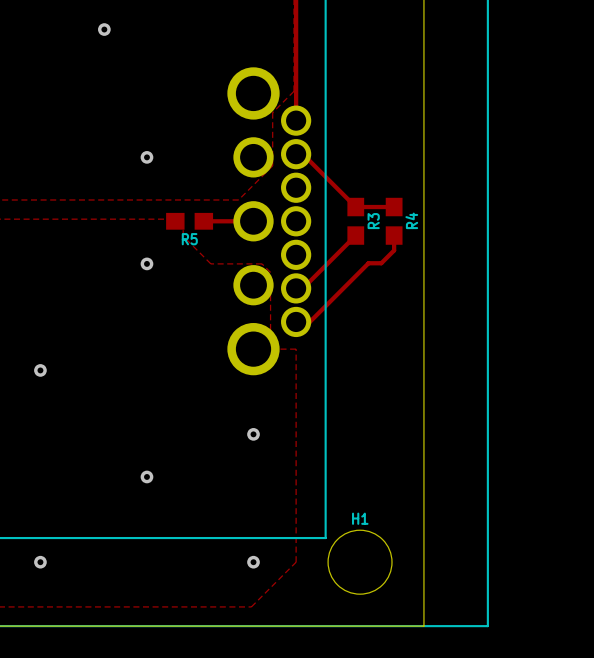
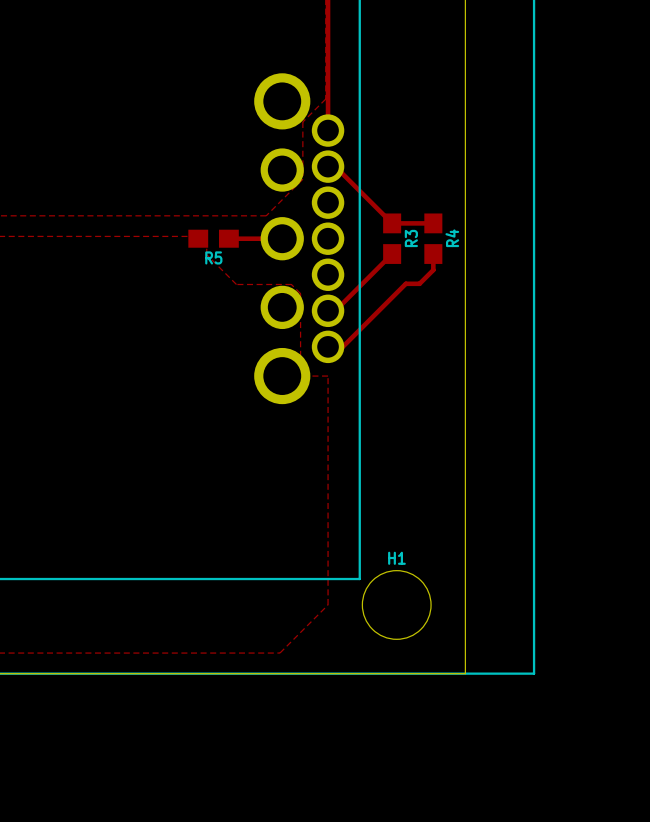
via: (104, 29) -> none
via: (146, 157) -> none
via: (146, 263) -> none
via: (40, 370) -> none
via: (253, 434) -> none
via: (146, 476) -> none
via: (40, 562) -> none
via: (253, 562) -> none

